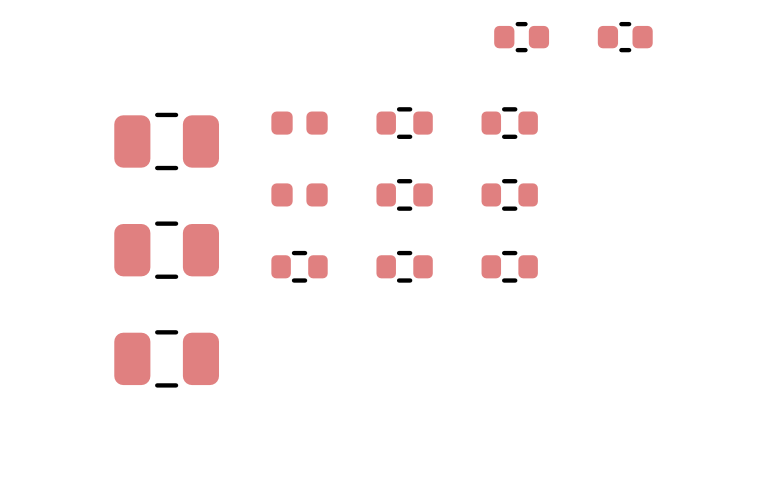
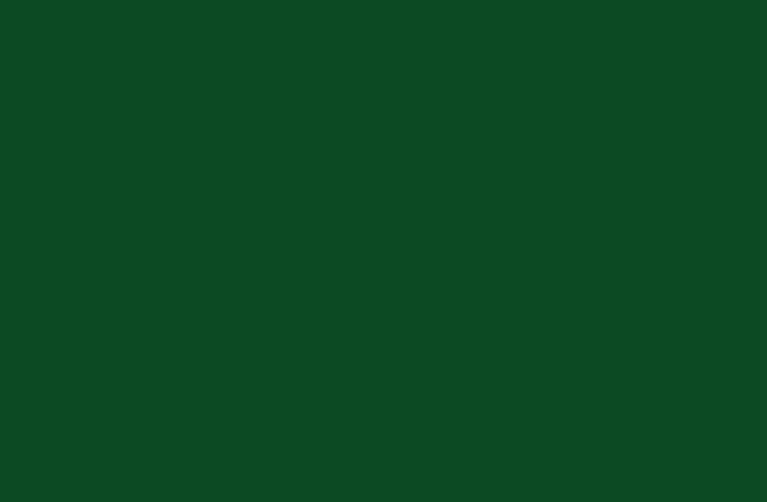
part: (521, 37) -> none
part: (625, 37) -> none
part: (299, 123) -> none
part: (404, 123) -> none
part: (509, 123) -> none
part: (166, 141) -> none
part: (299, 194) -> none
part: (404, 194) -> none
part: (509, 194) -> none
part: (166, 250) -> none
part: (299, 266) -> none
part: (404, 266) -> none
part: (509, 266) -> none
part: (166, 358) -> none

